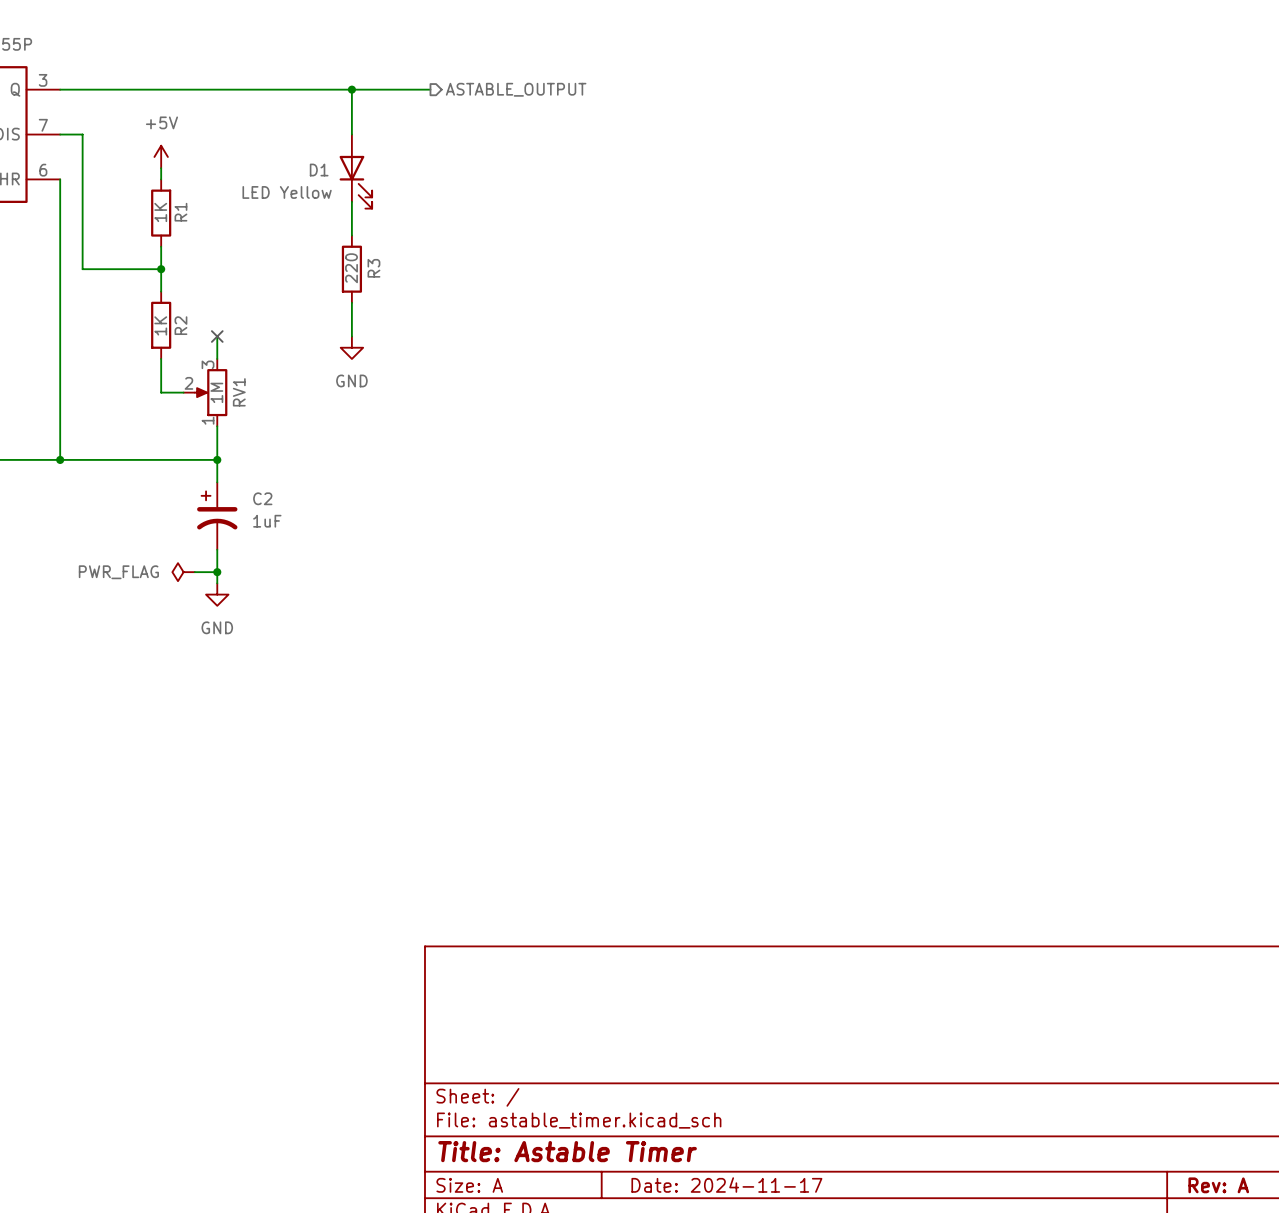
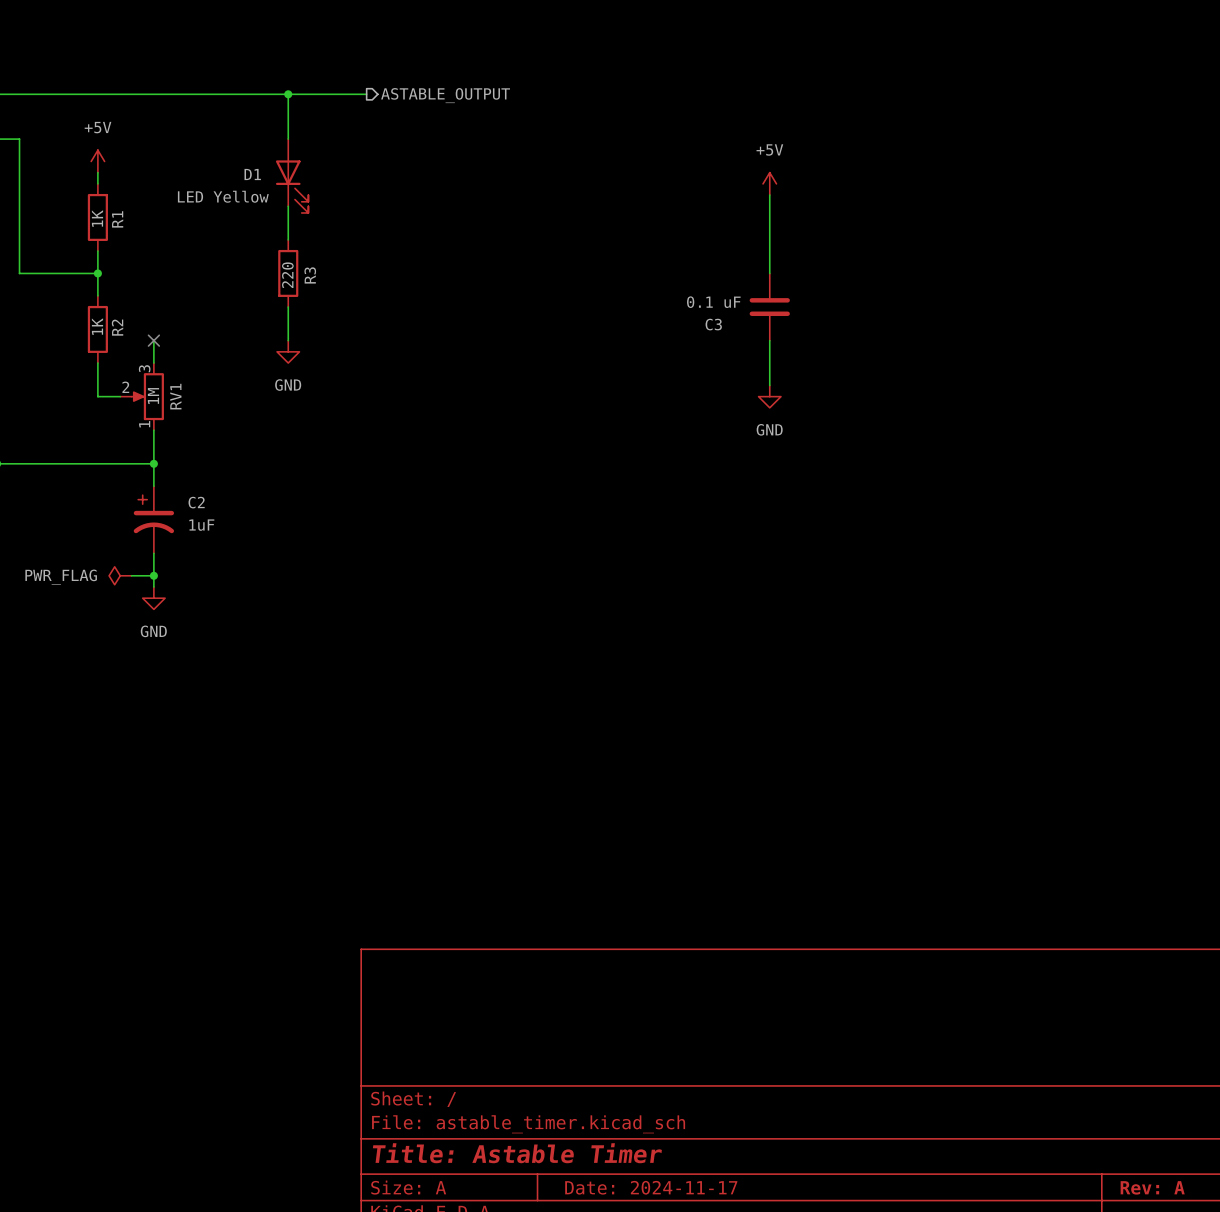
power symbol: none -> +5V (769, 183)
wire: none -> (769, 195) (769, 273)
C3: none -> 0.1 uF (769, 307)
wire: none -> (769, 340) (769, 385)
power symbol: none -> GND (769, 396)

